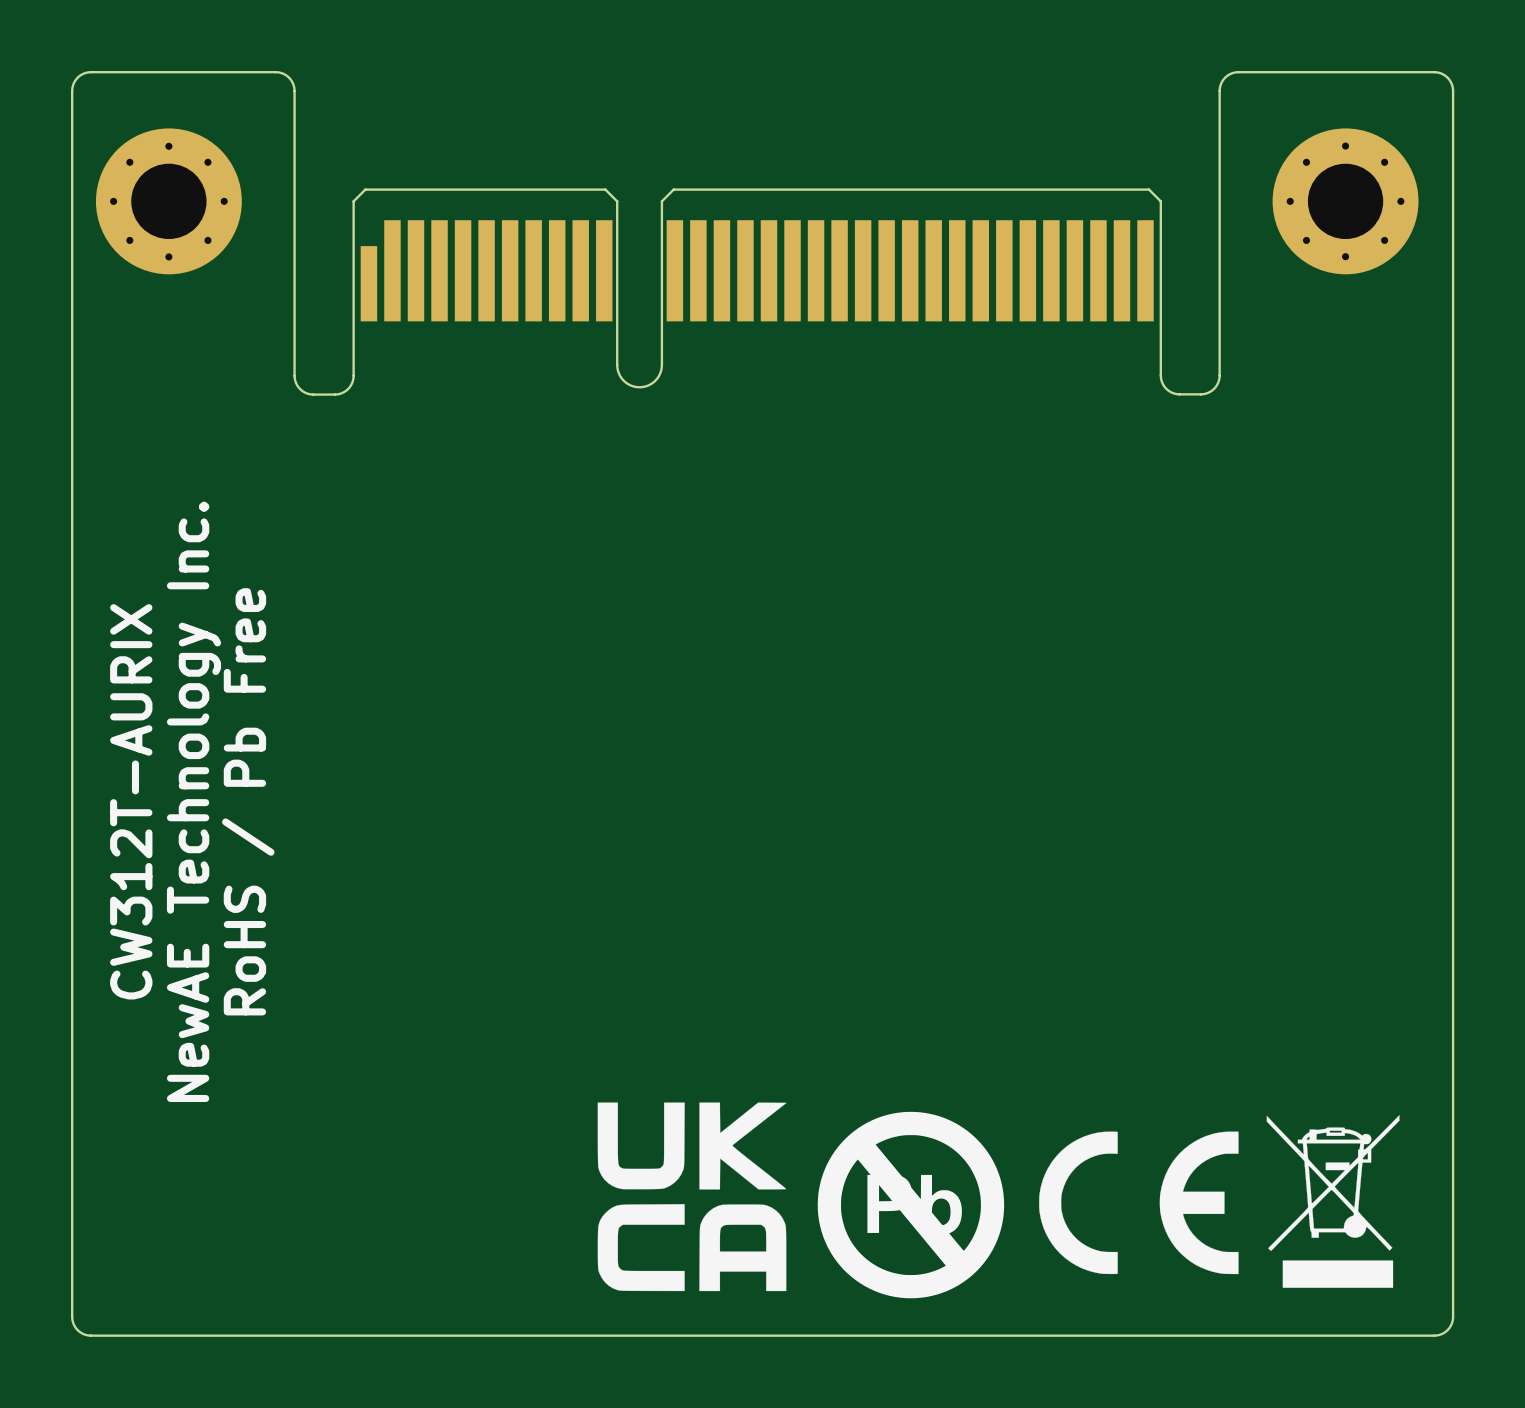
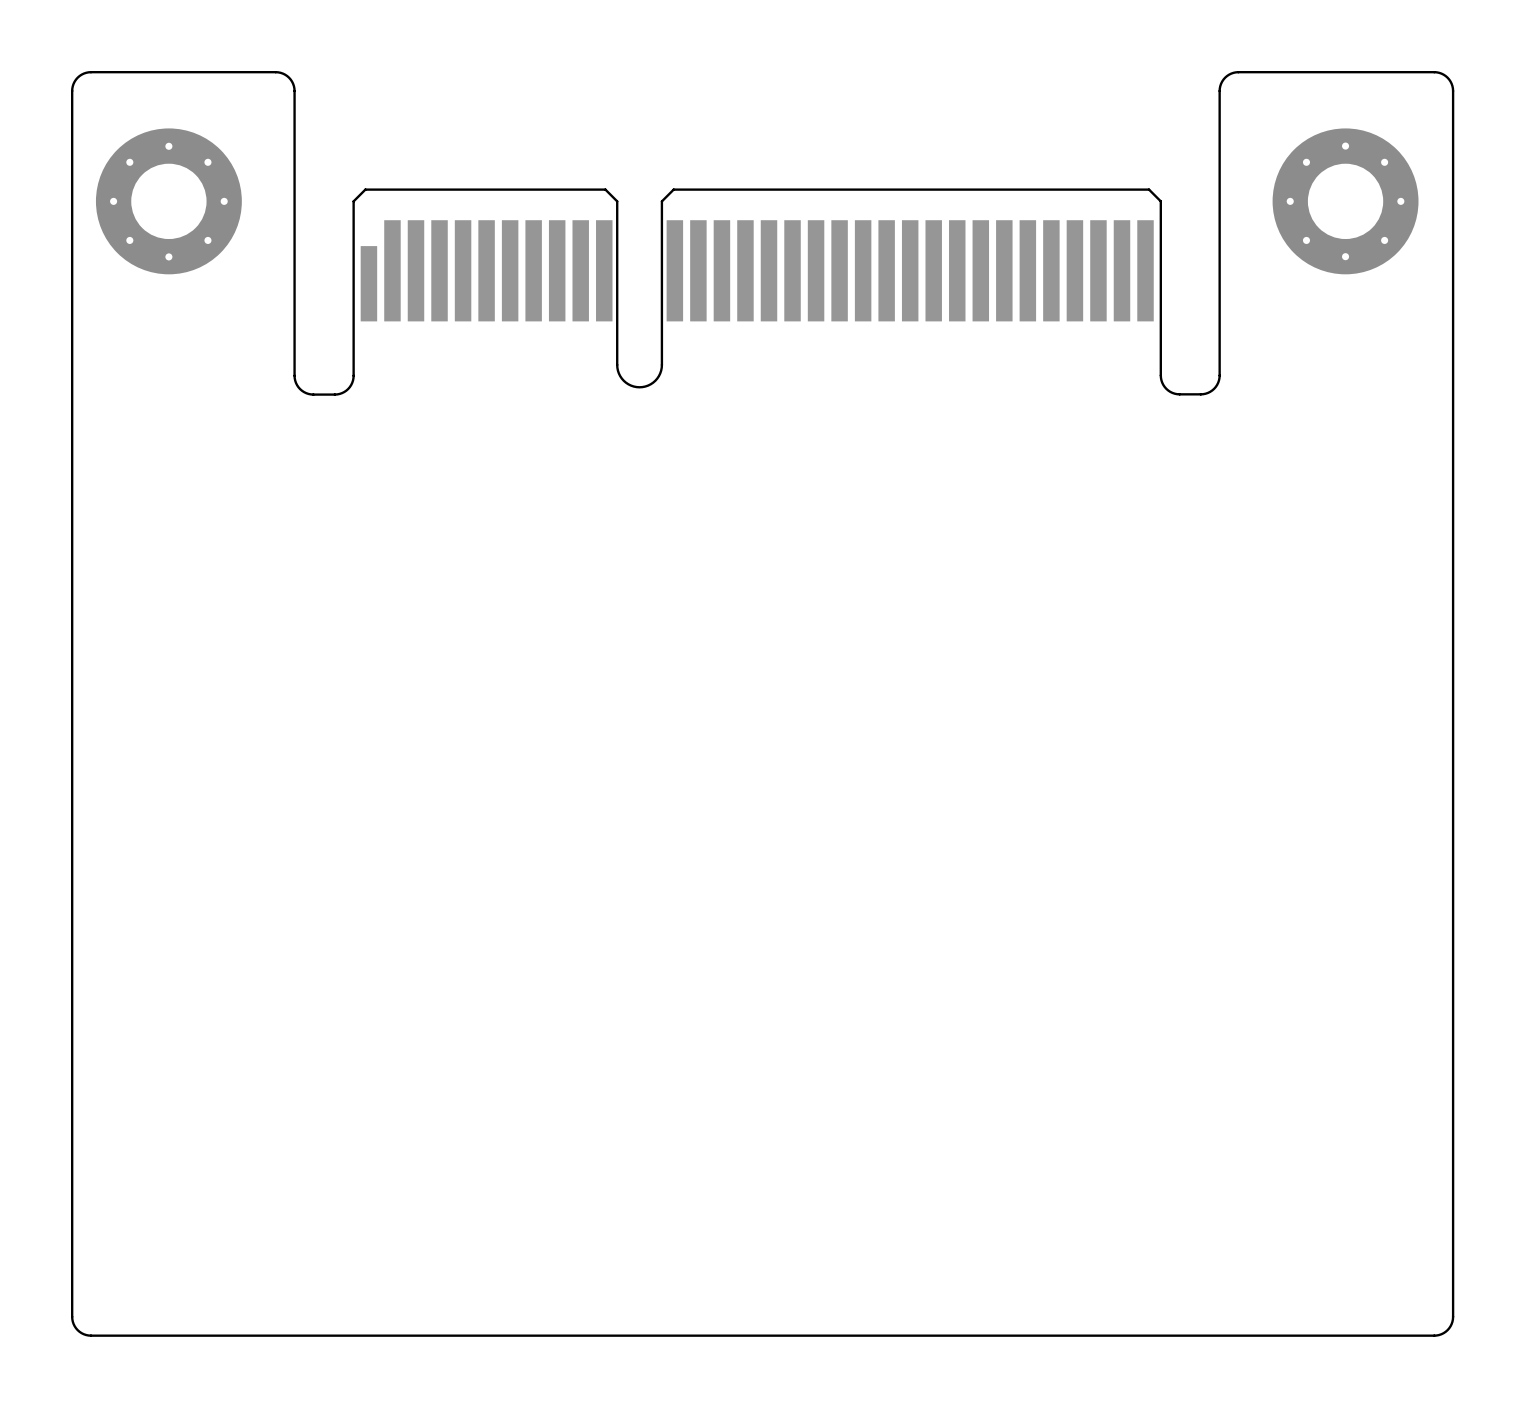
text: CW312T-AURIX (131, 801) -> none
text: NewAE Technology Inc. (193, 801) -> none
text: RoHS / Pb Free (248, 801) -> none
drawing: [597, 1102, 787, 1292] -> none
drawing: [817, 1111, 1005, 1299] -> none
drawing: [1039, 1115, 1400, 1288] -> none

